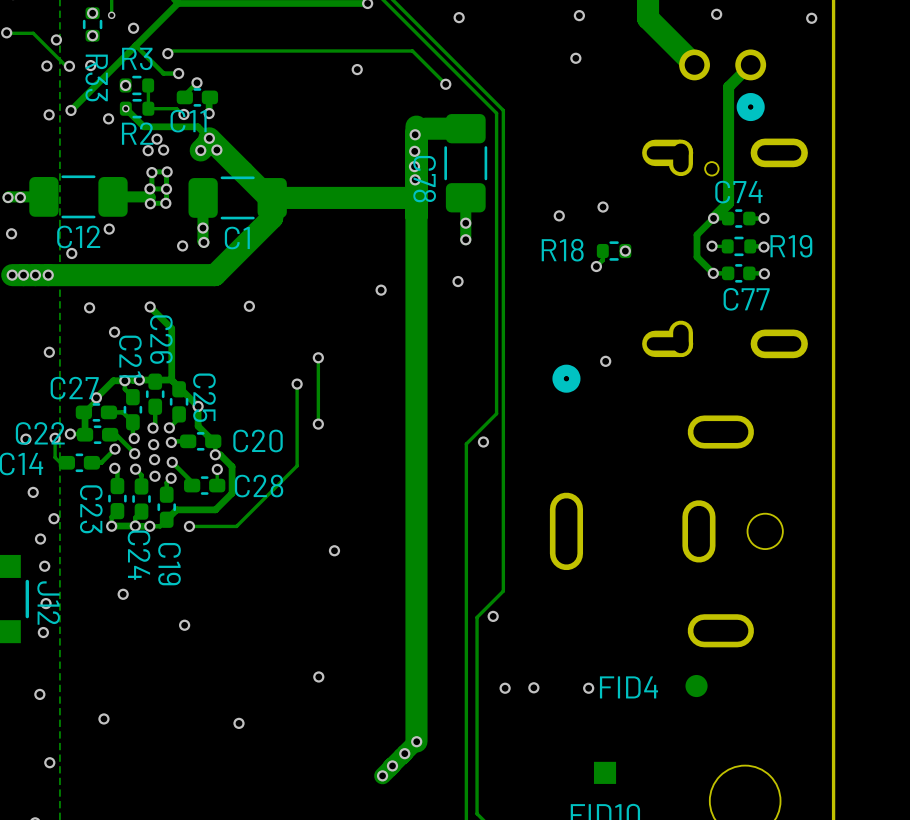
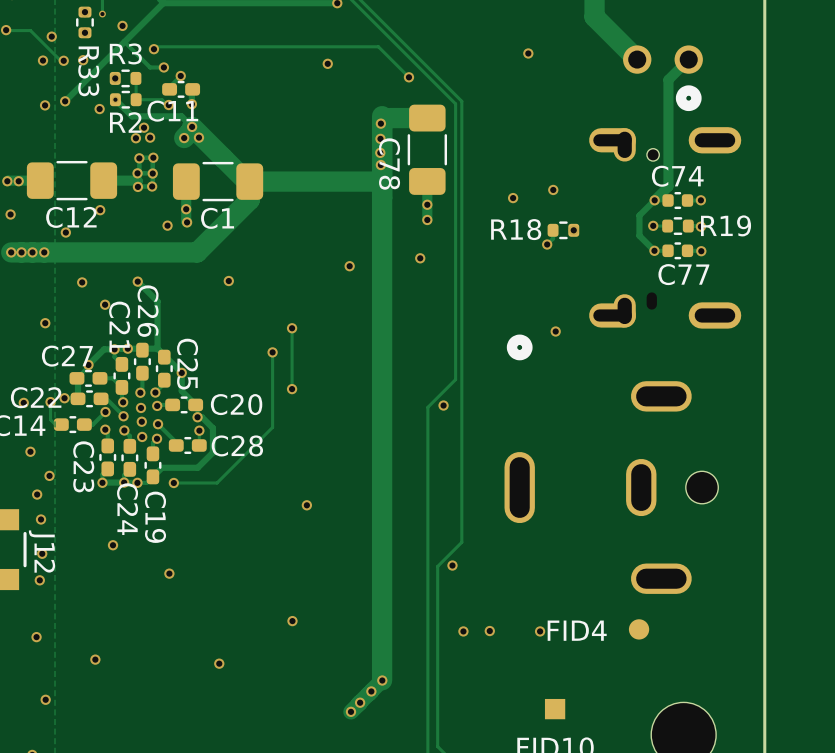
via: (716, 14) -> none
via: (579, 15) -> none
via: (459, 17) -> none
via: (811, 18) -> none

